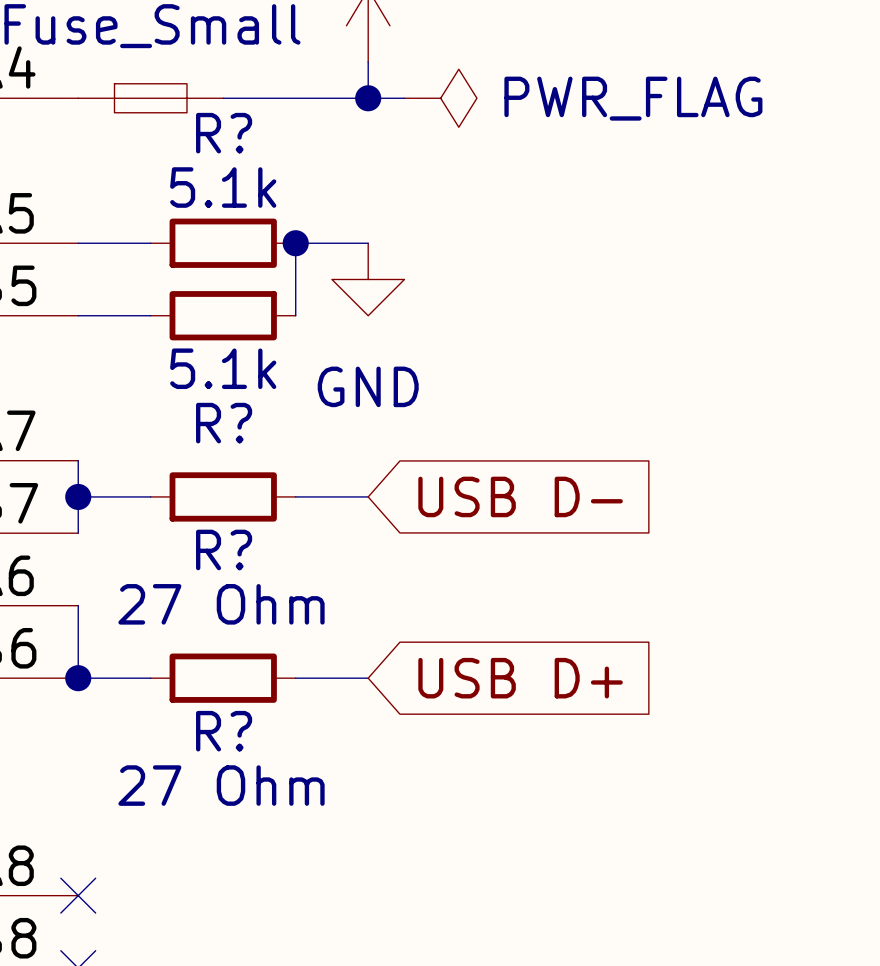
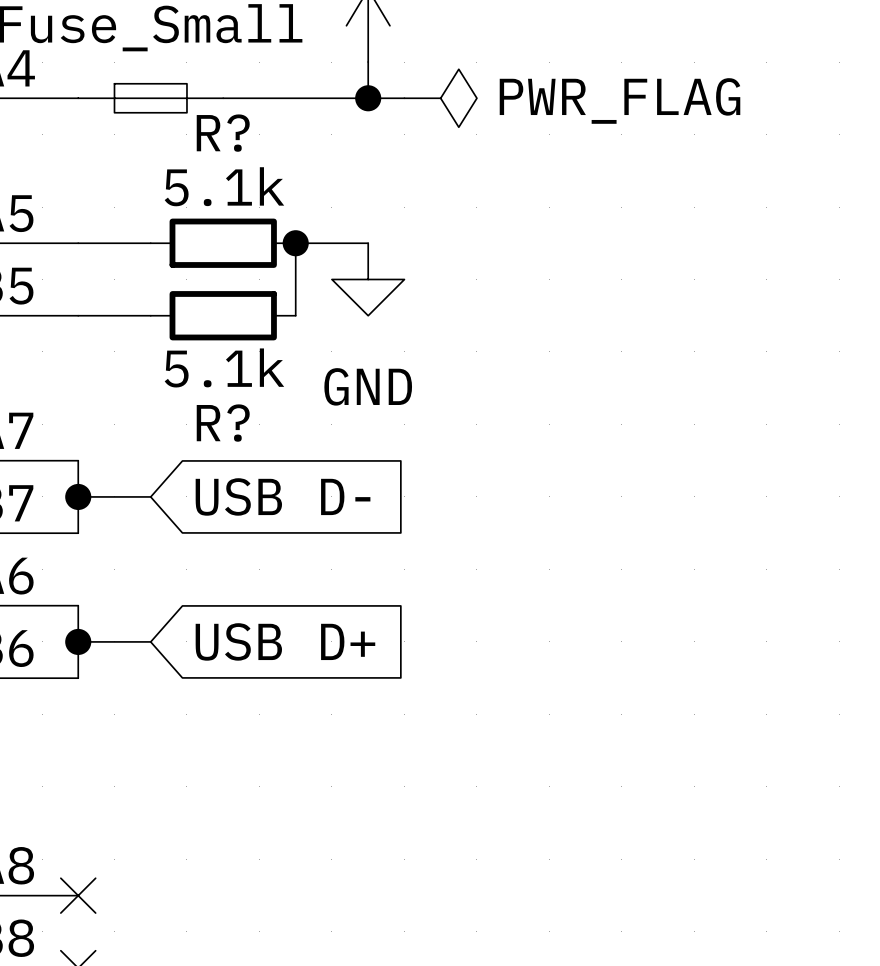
R?: 27 Ohm (223, 496) -> none
wire: (295, 496) (368, 496) -> none
global label position: USB D- (520, 496) -> USB D- (283, 496)
wire: (78, 678) (150, 678) -> (78, 641) (150, 641)
junction position: (78, 678) -> (78, 641)
R?: 27 Ohm (223, 678) -> none
global label position: USB D+ (520, 678) -> USB D+ (285, 641)

